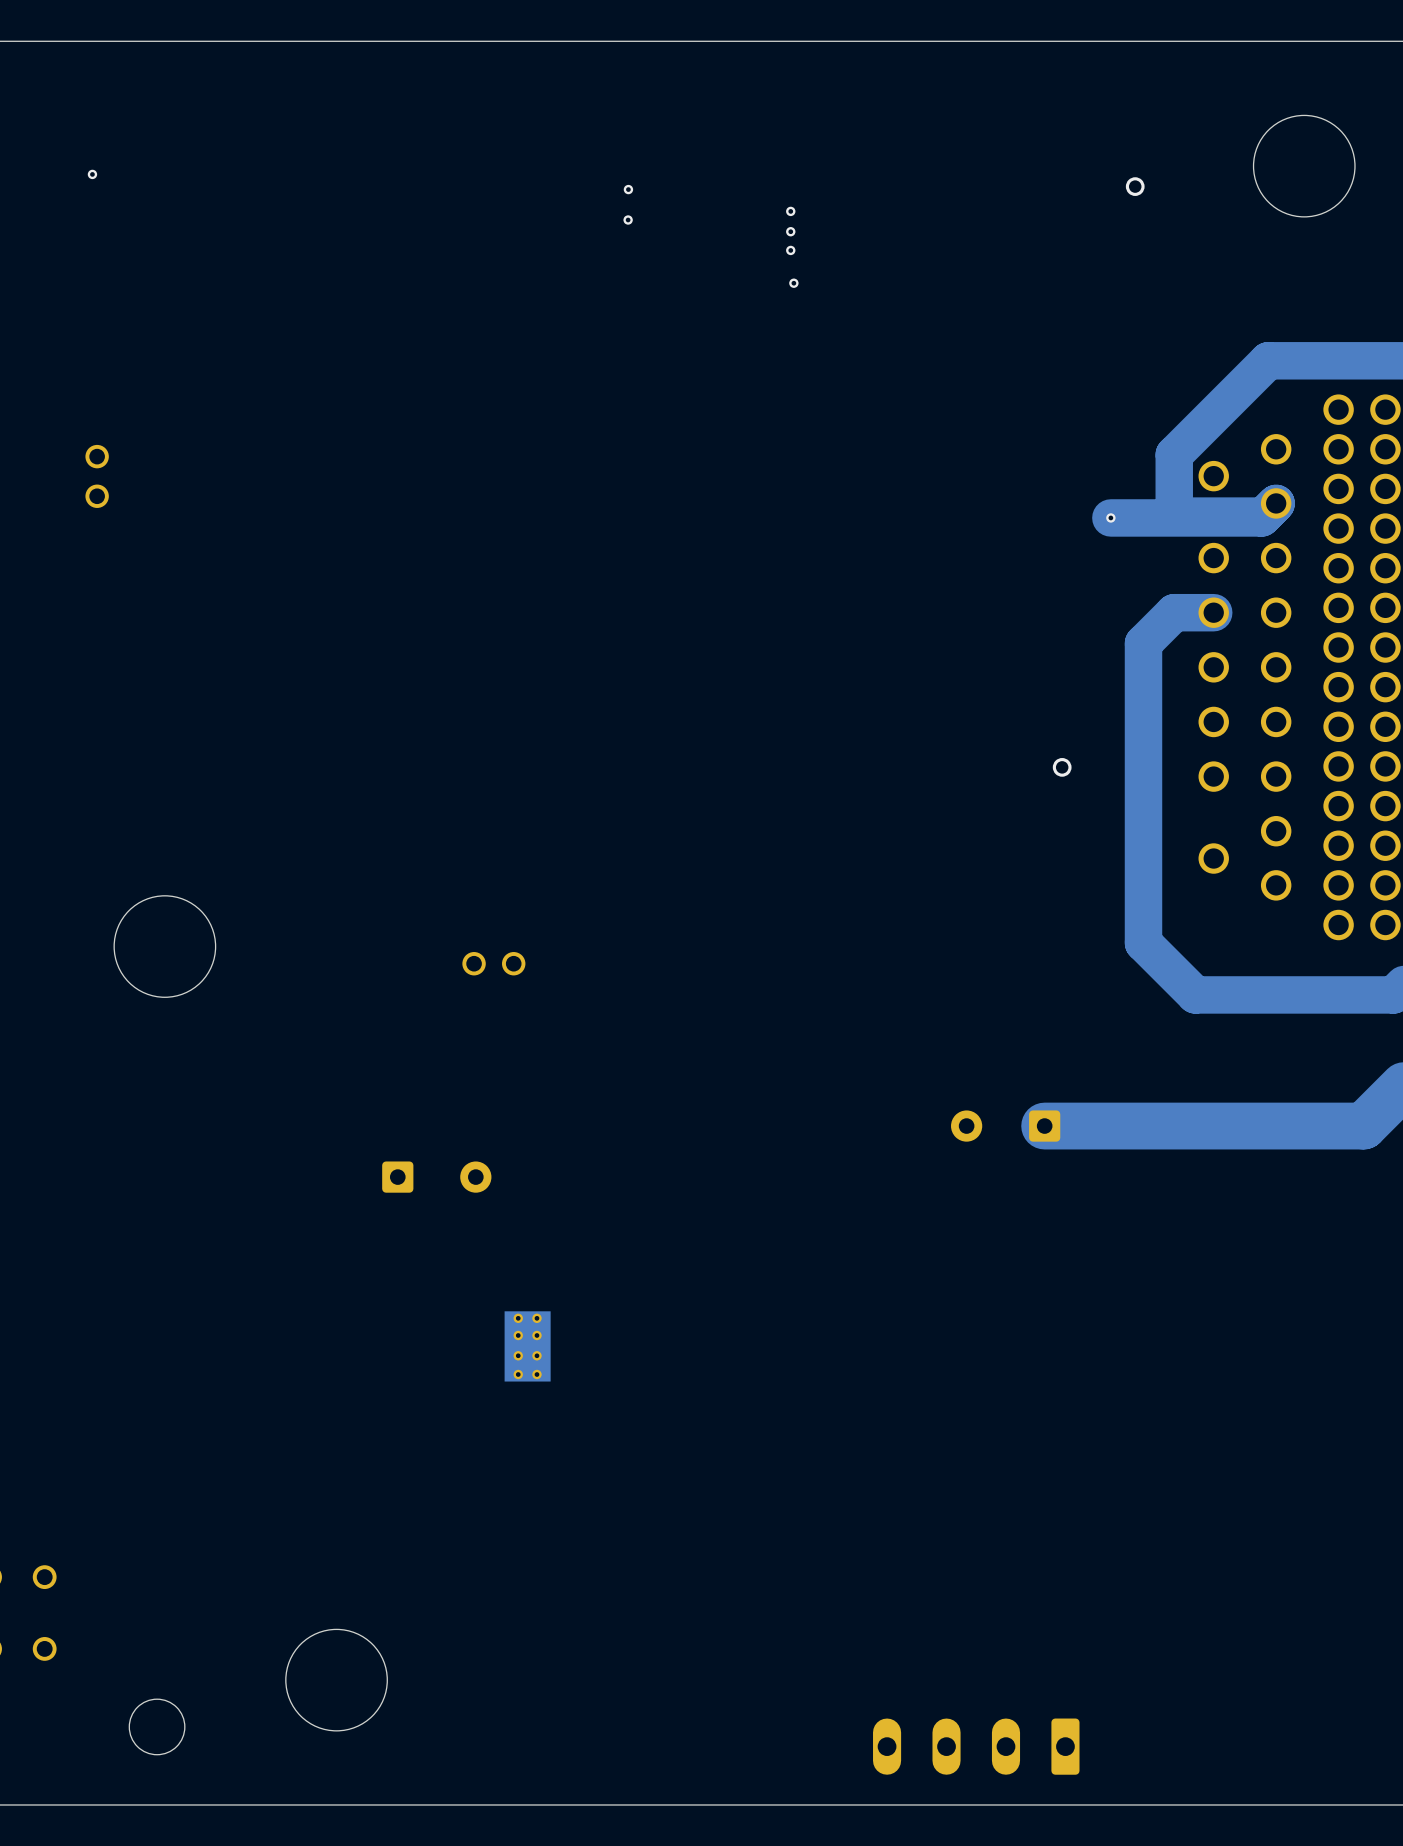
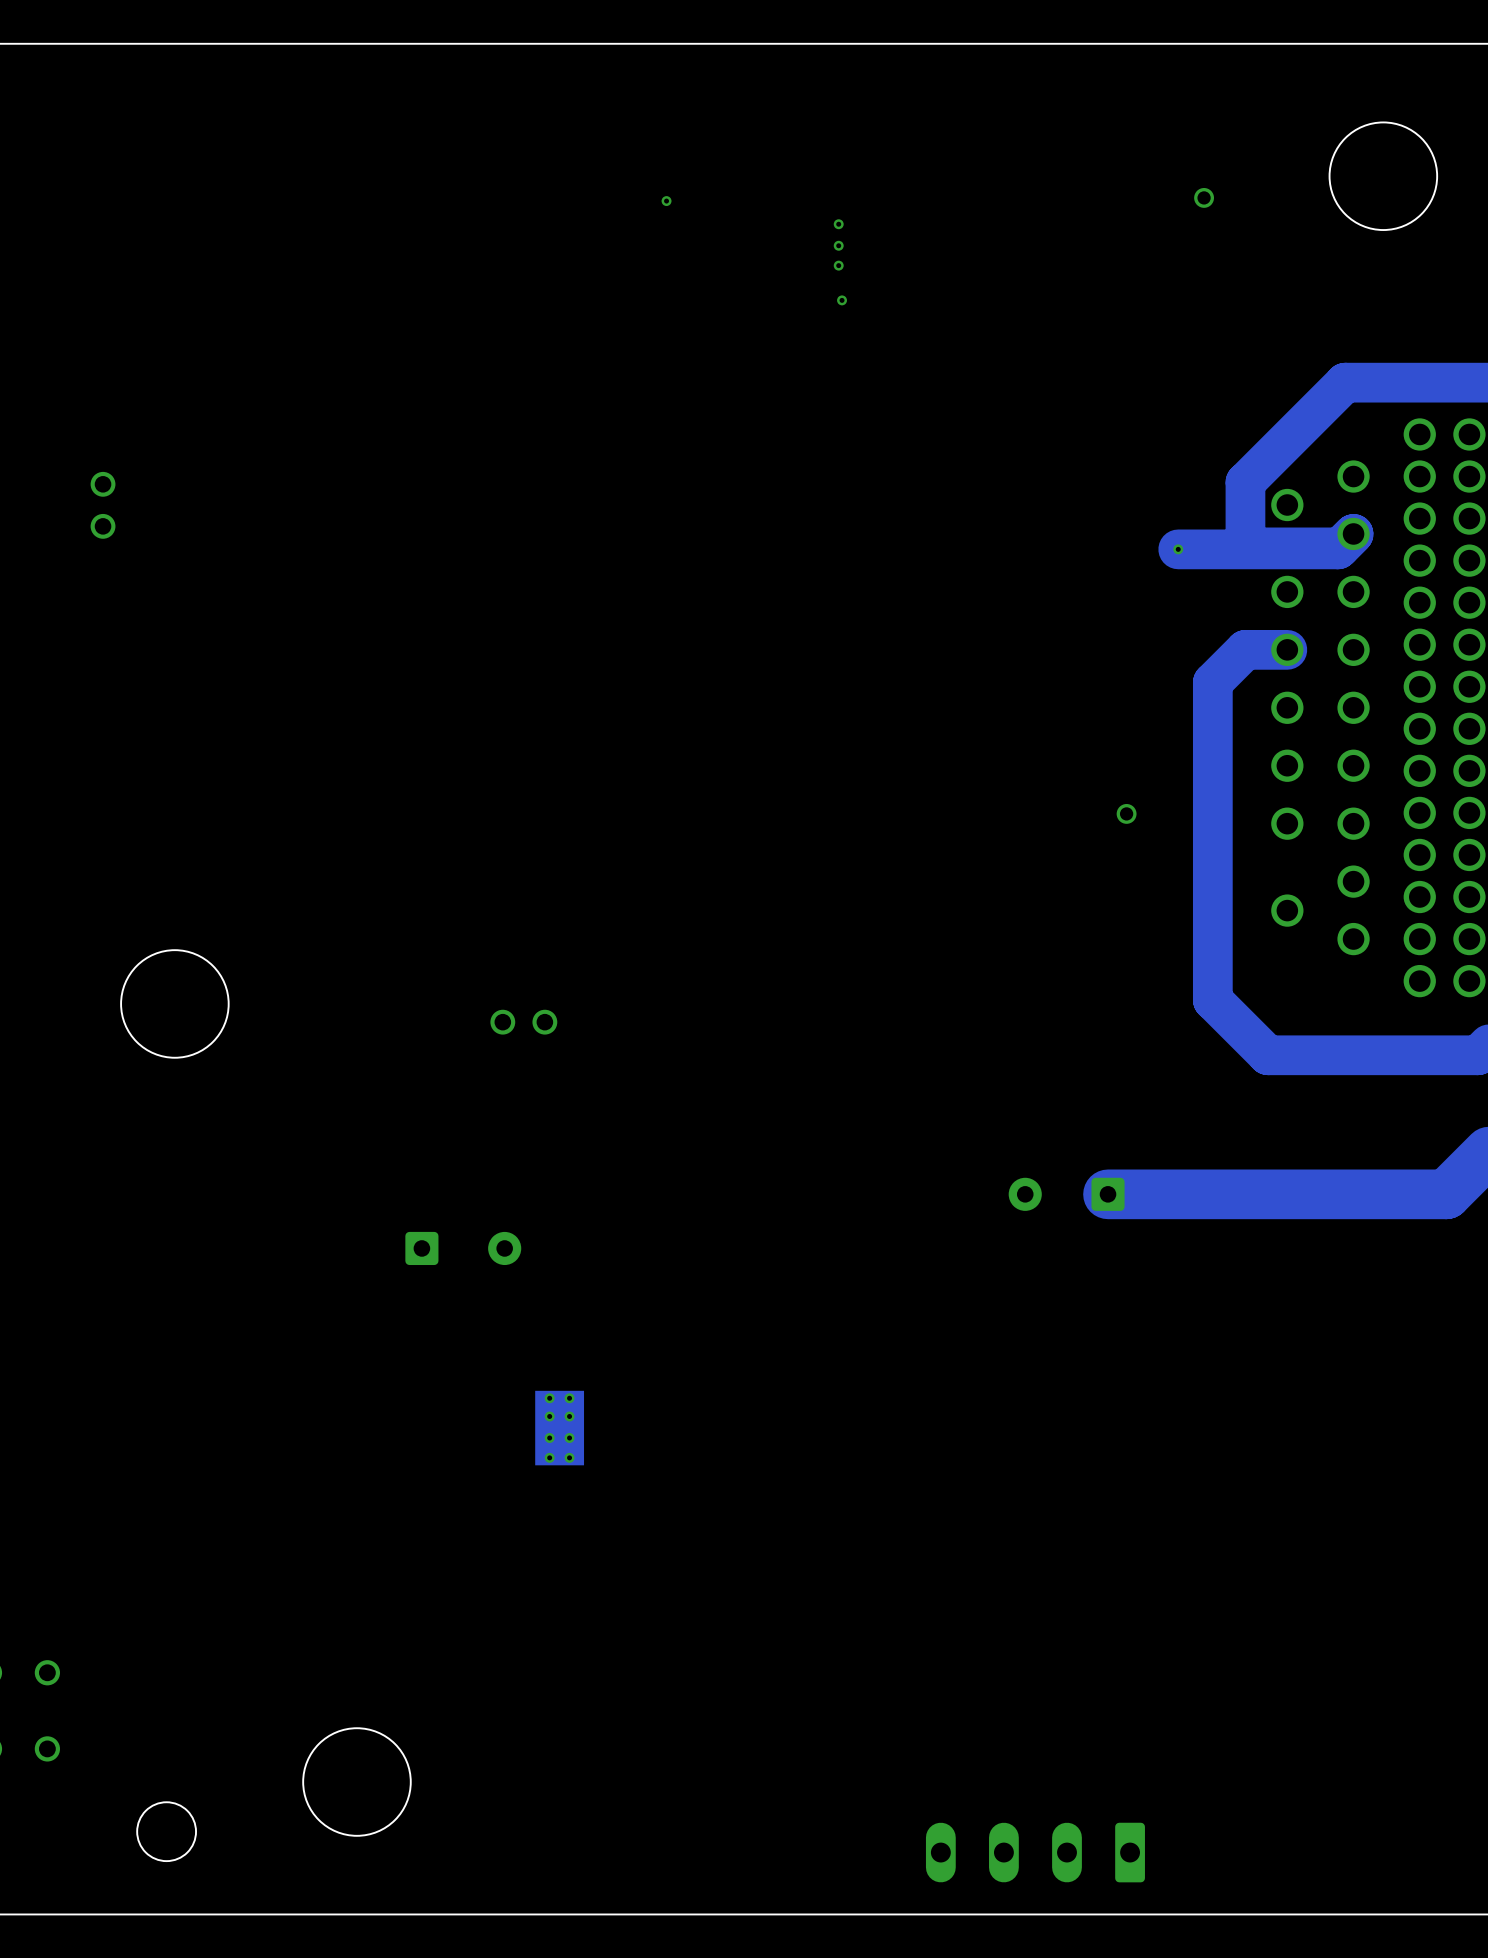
via: (92, 174) -> none
via: (628, 220) -> none

